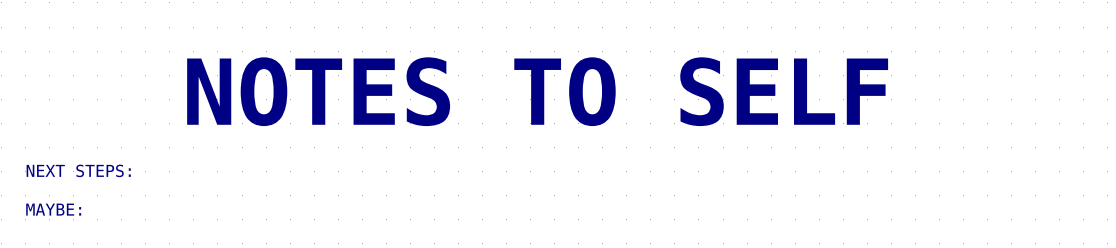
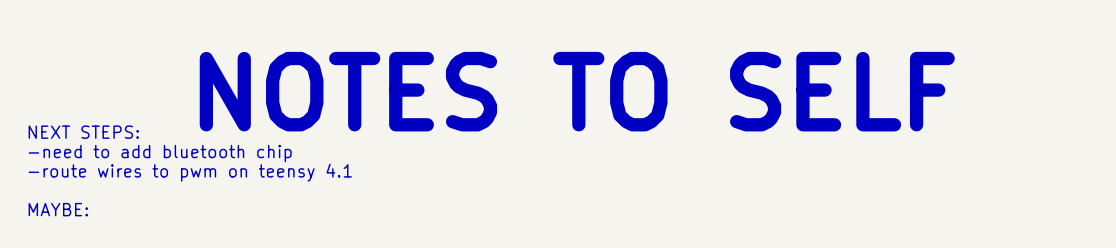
text: none -> NEXT STEPS: (83, 132)
text: none -> -need to add bluetooth chip (160, 153)
text: NEXT STEPS: (78, 170) -> -route wires to pwm on teensy 4.1 (190, 172)

